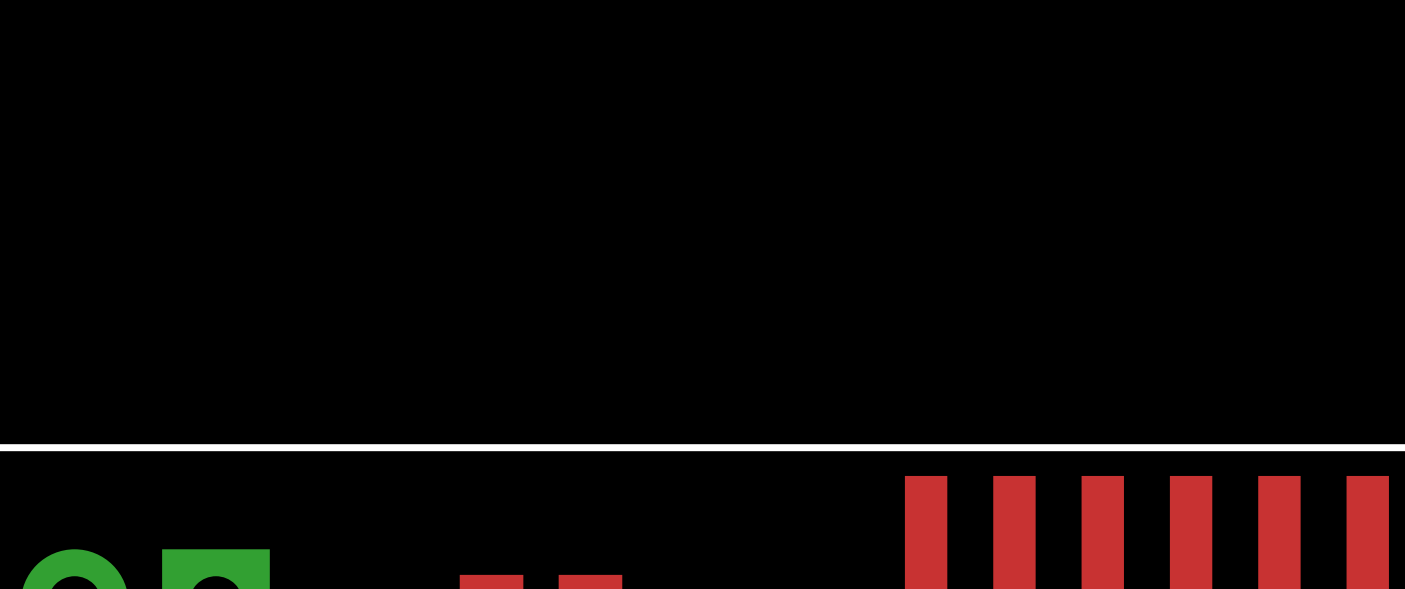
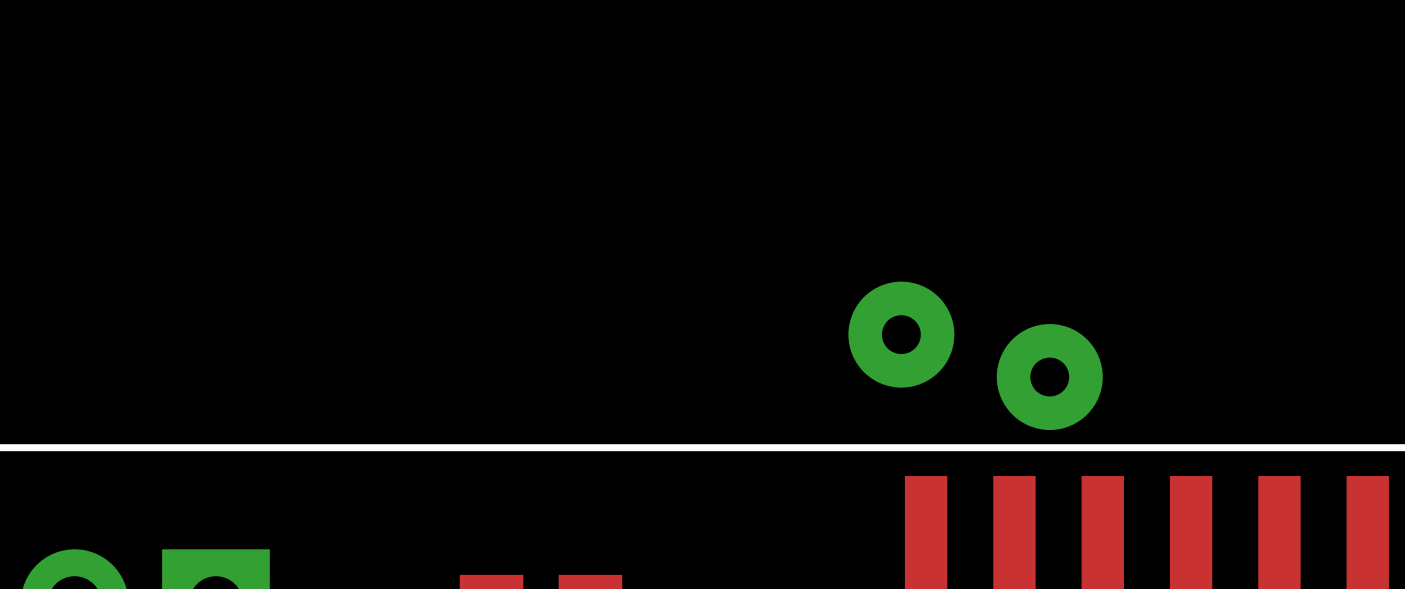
part: none -> (901, 334)
part: none -> (1049, 377)

